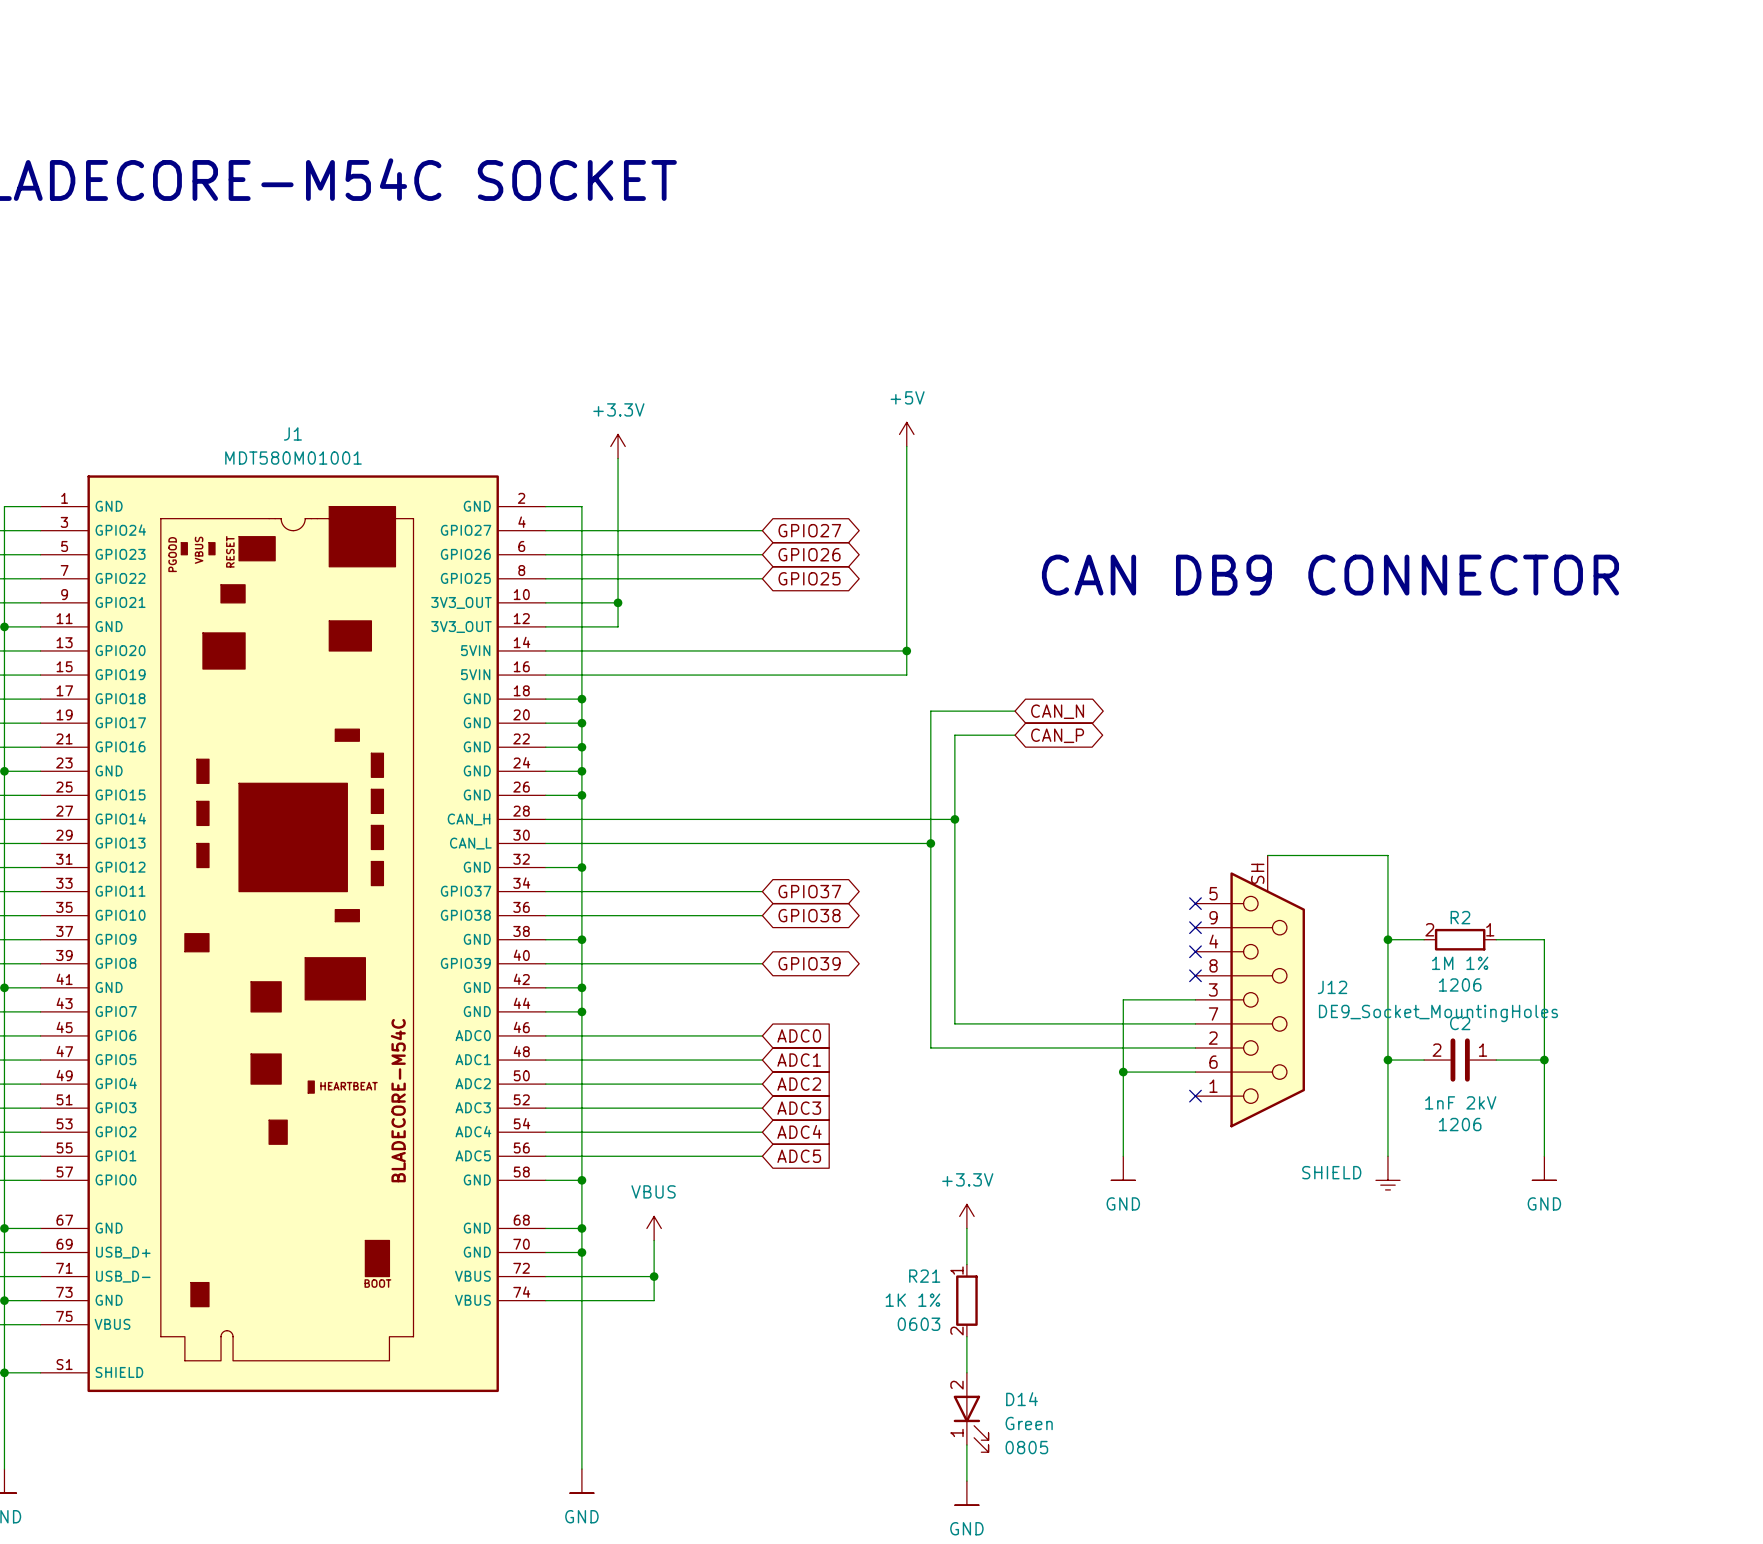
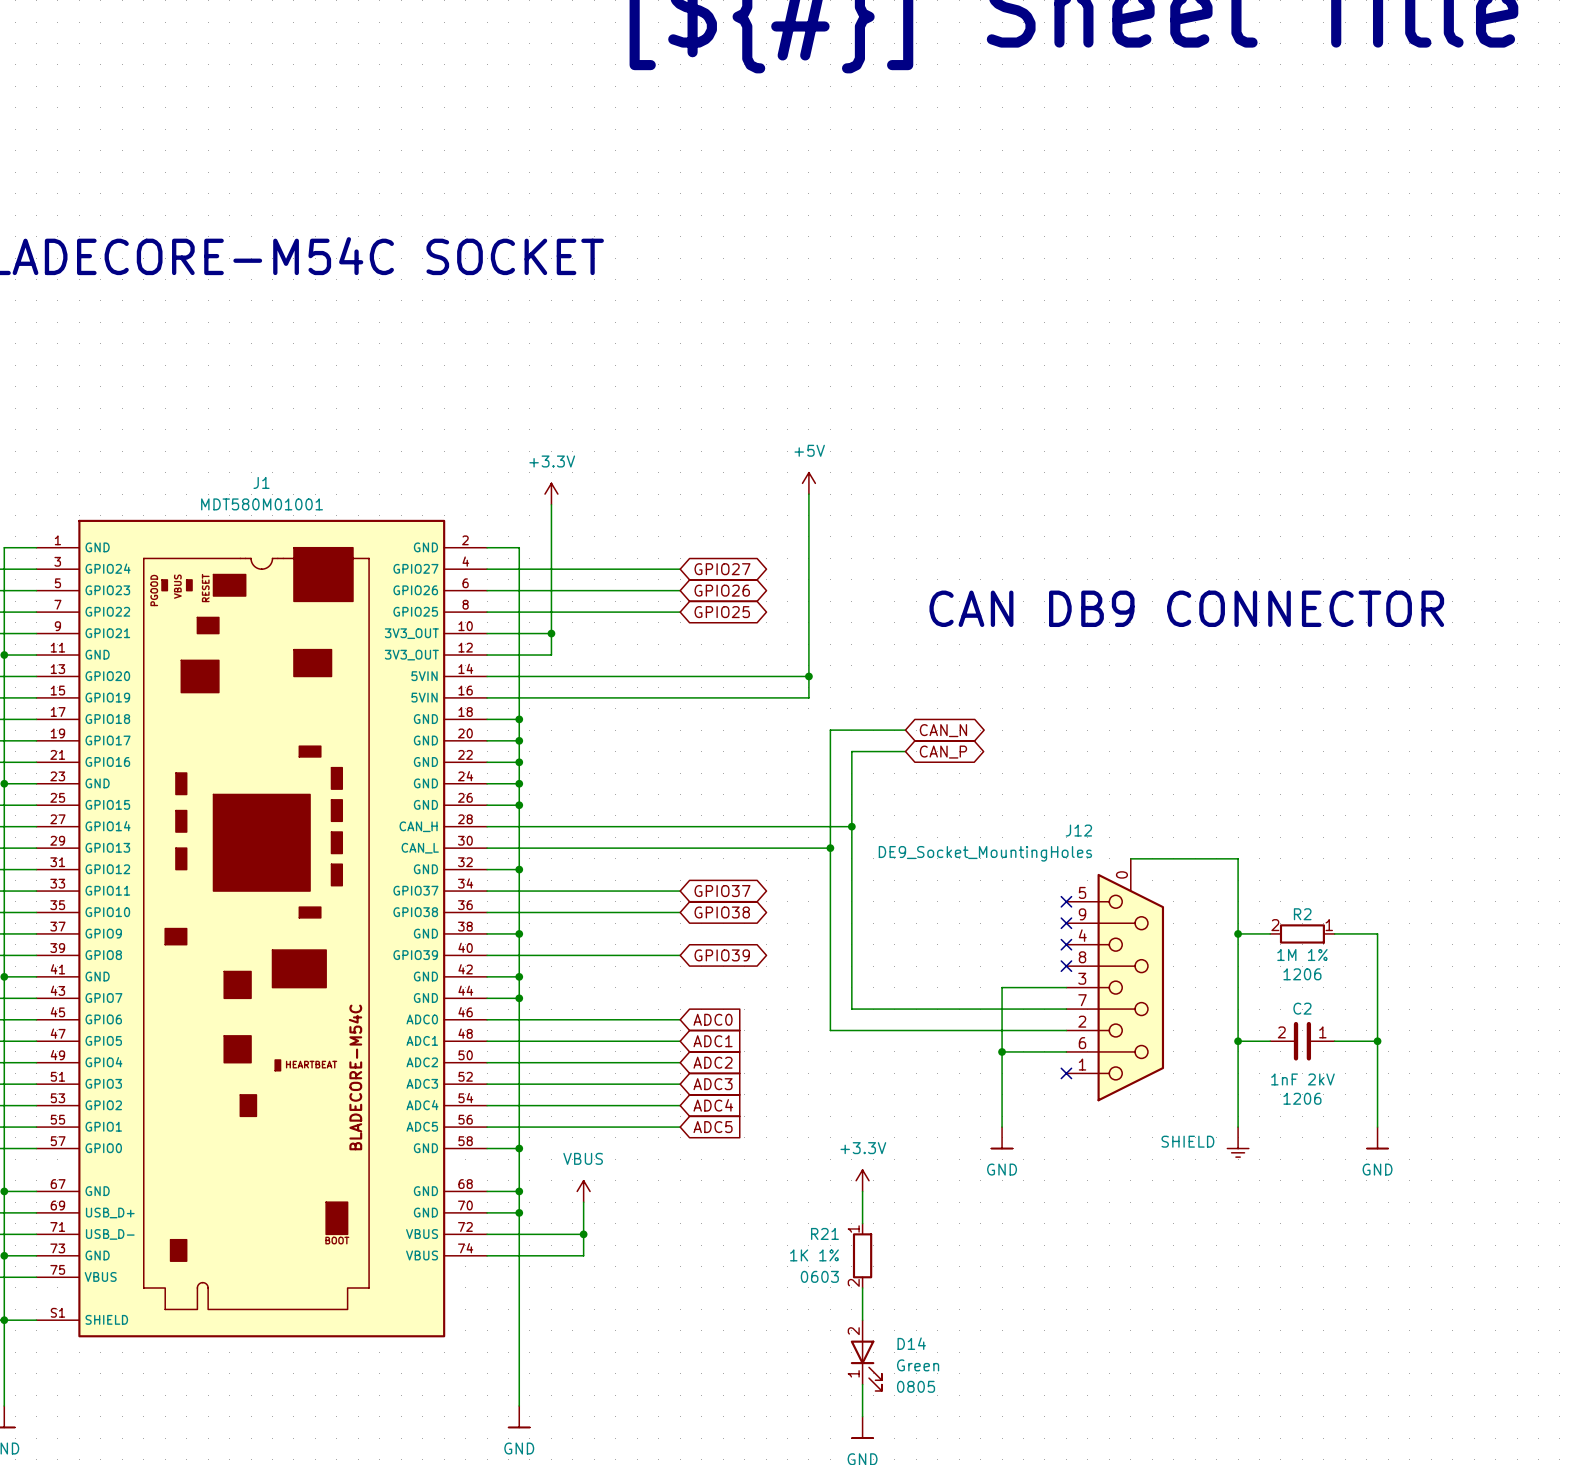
J12 pin number: SH (1257, 873) -> 0 (1121, 874)
J12 name position: J12 (1332, 987) -> J12 (1078, 830)
J12 value position: DE9_Socket_MountingHoles (1438, 1013) -> DE9_Socket_MountingHoles (985, 853)

